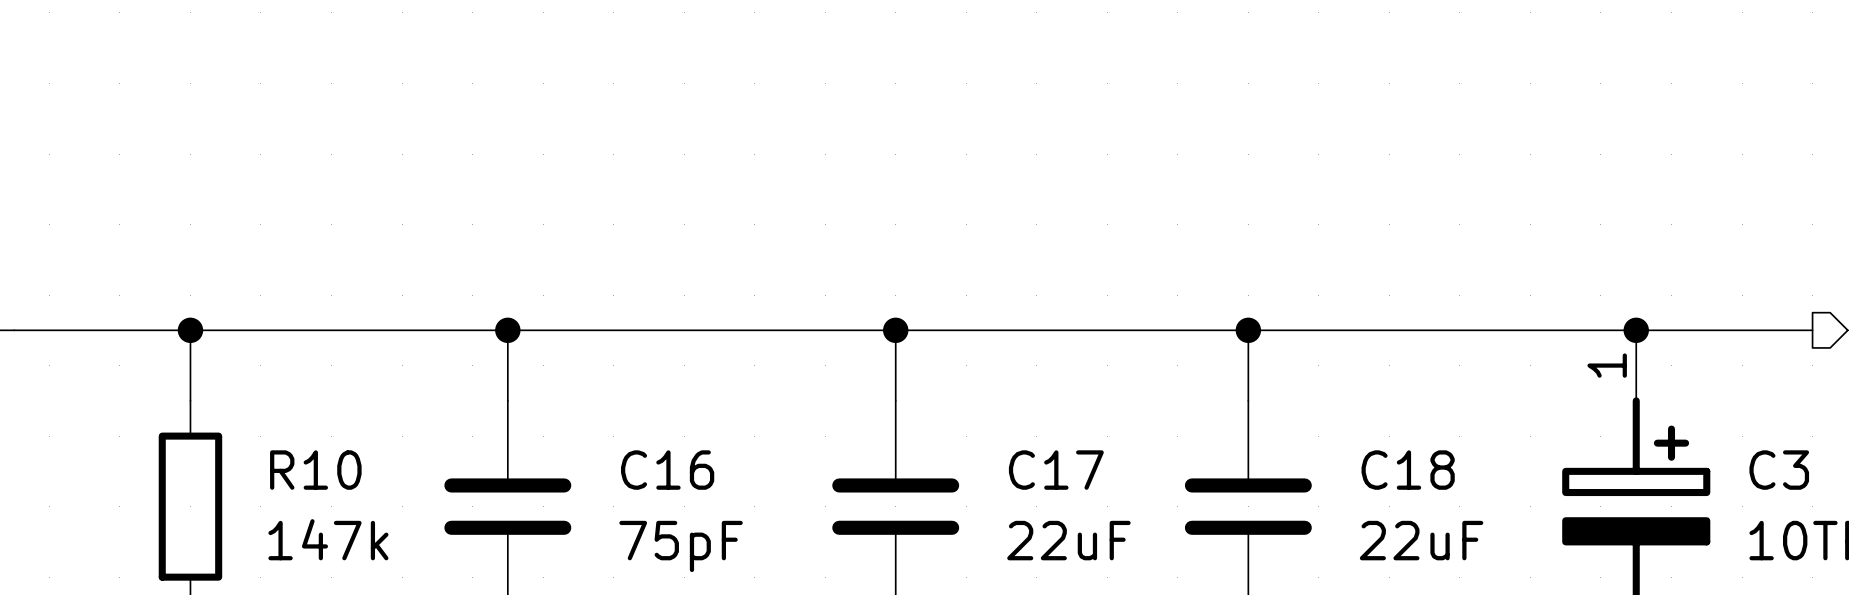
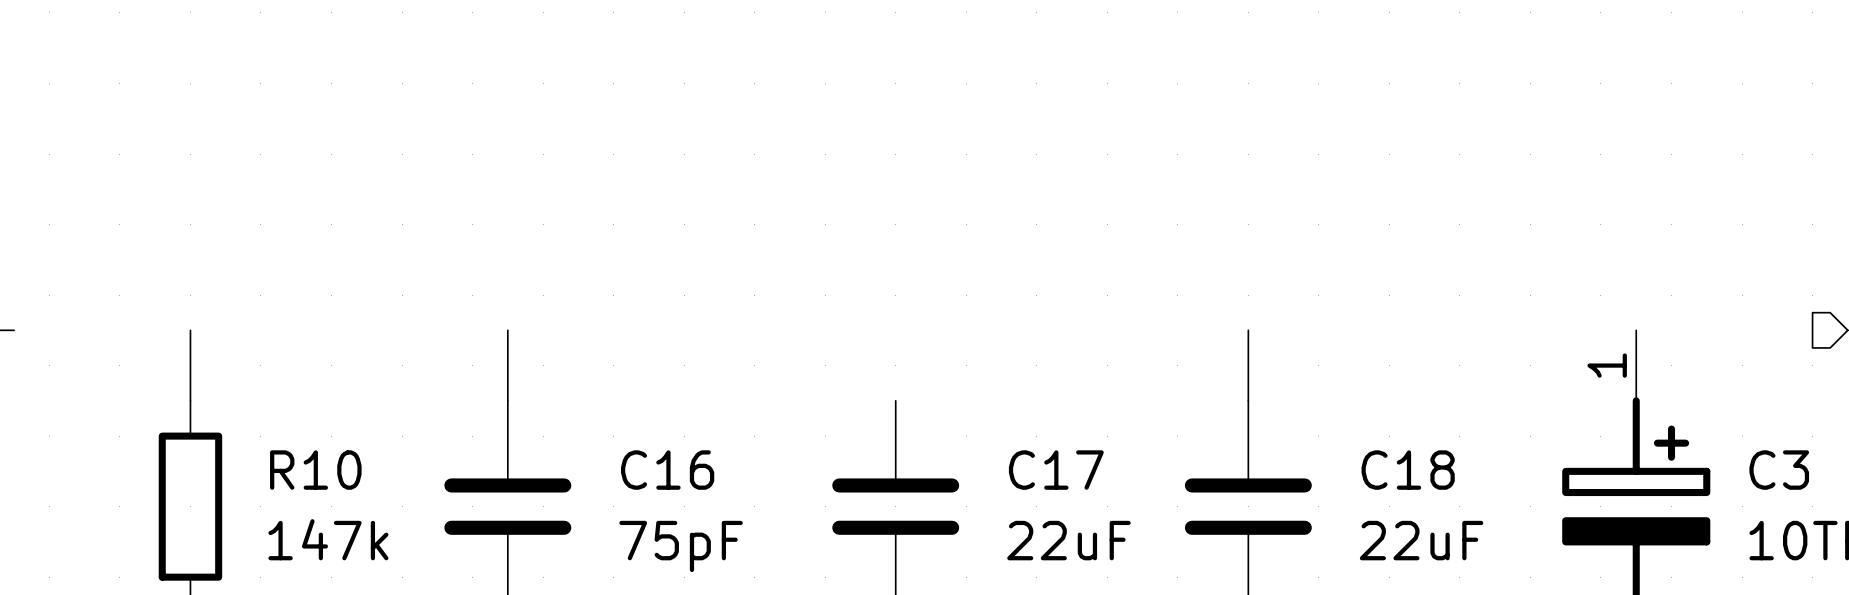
wire: (14, 330) (1812, 330) -> none
junction: (190, 330) -> none
junction: (507, 330) -> none
wire: (895, 330) (895, 400) -> none
junction: (895, 330) -> none
junction: (1248, 330) -> none
junction: (1636, 330) -> none

